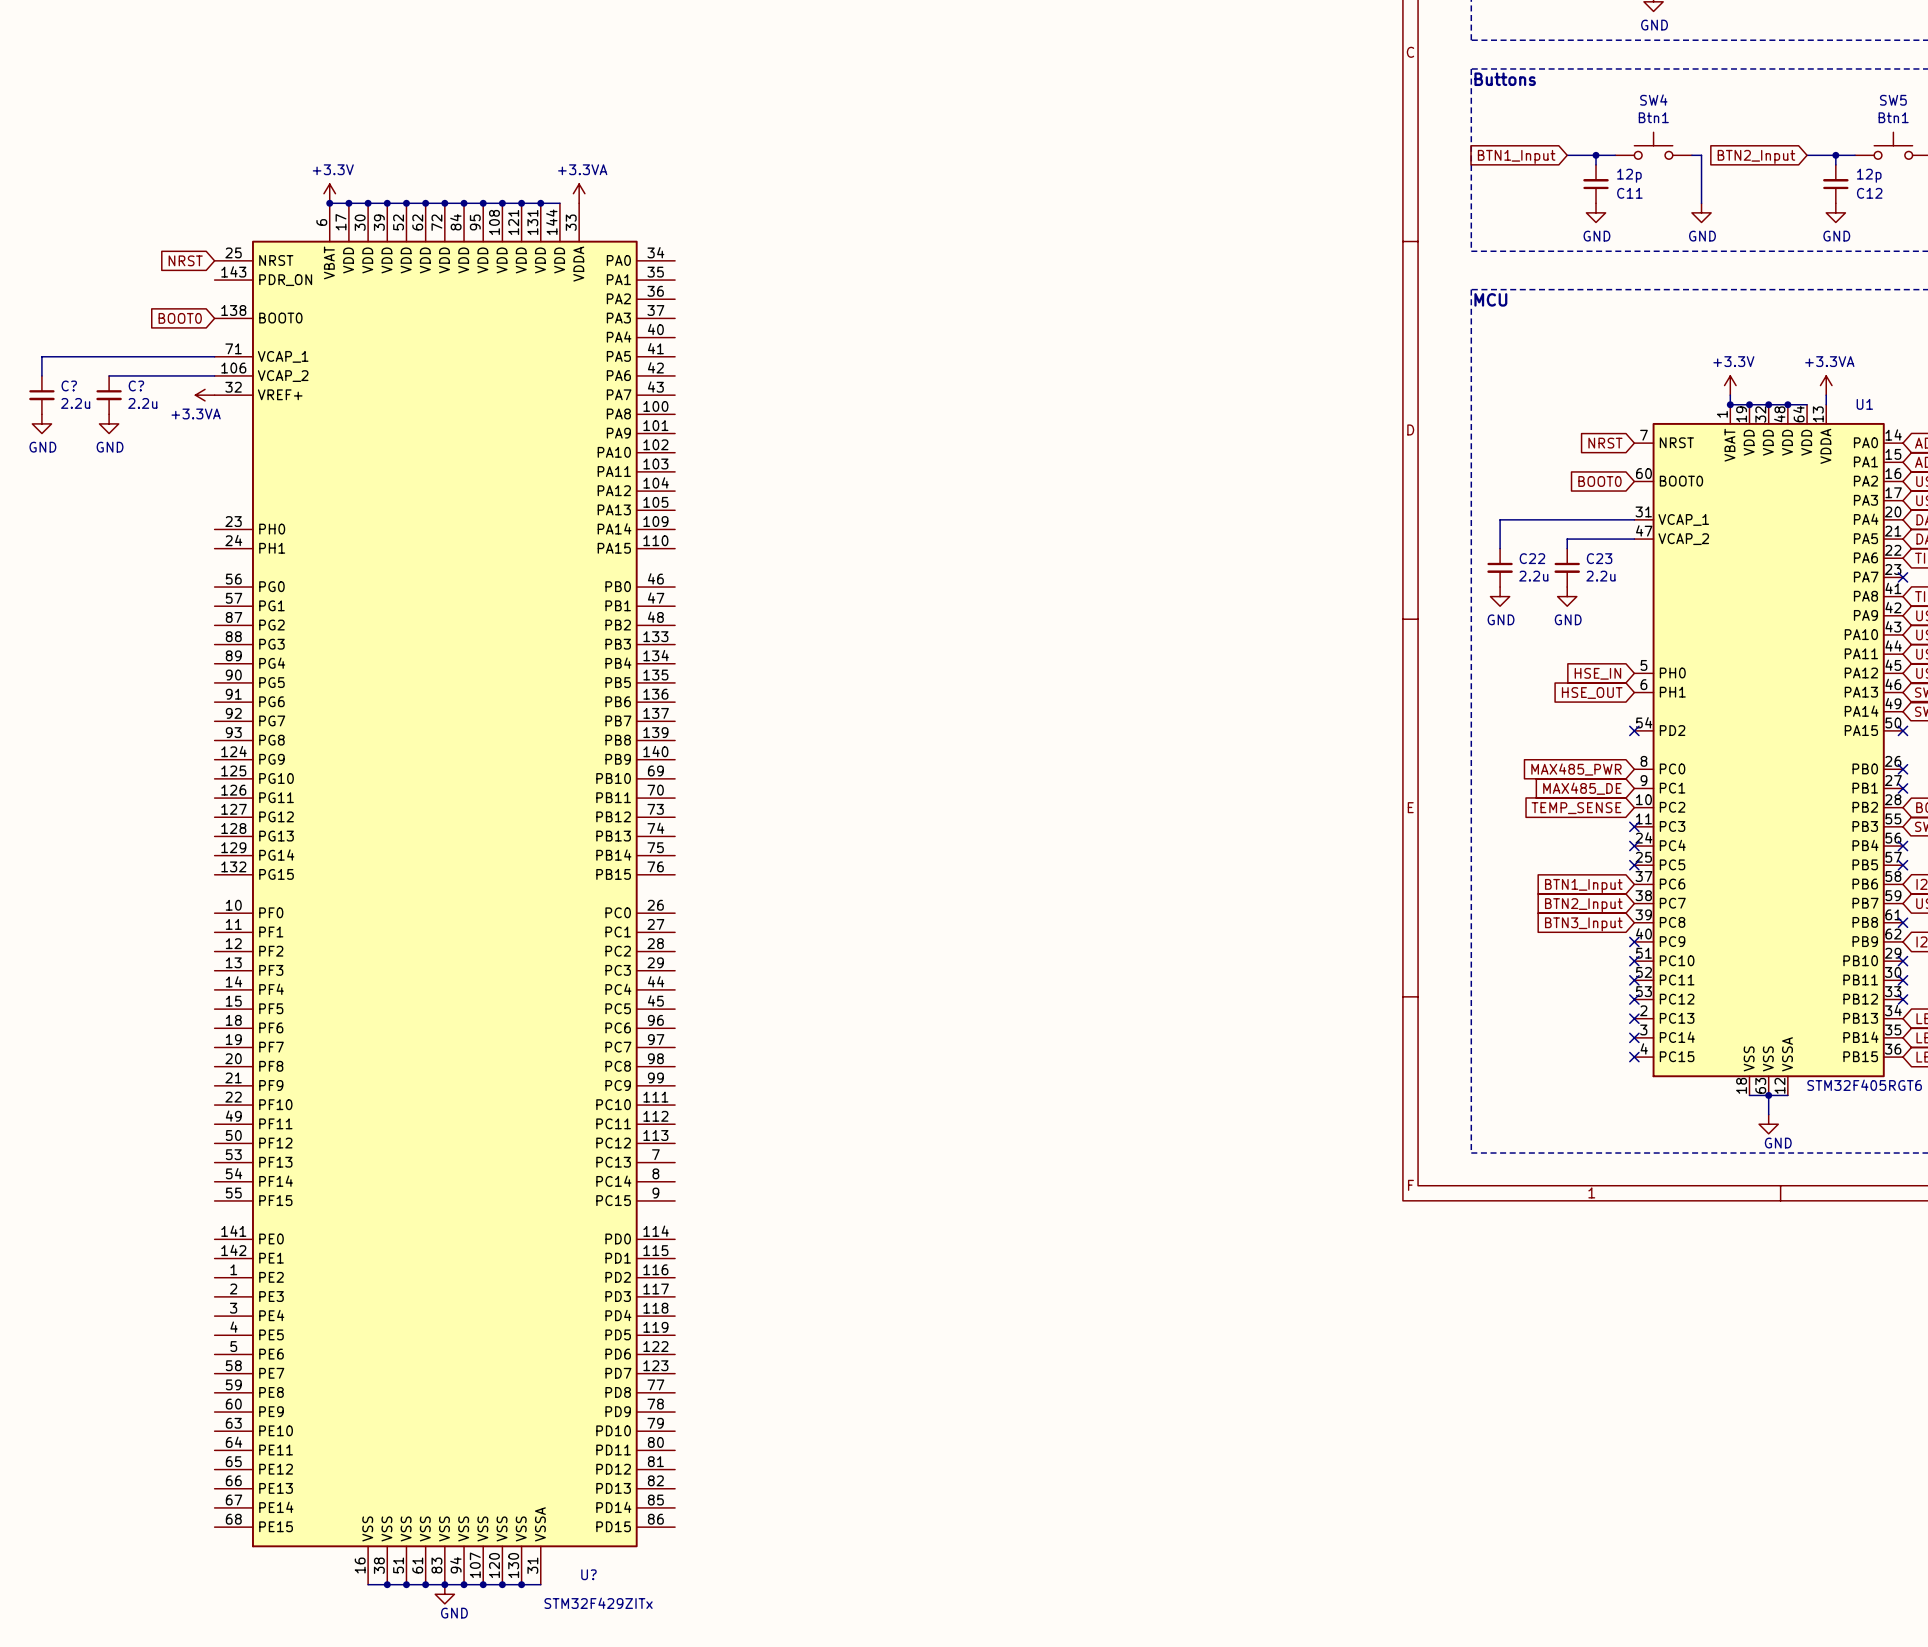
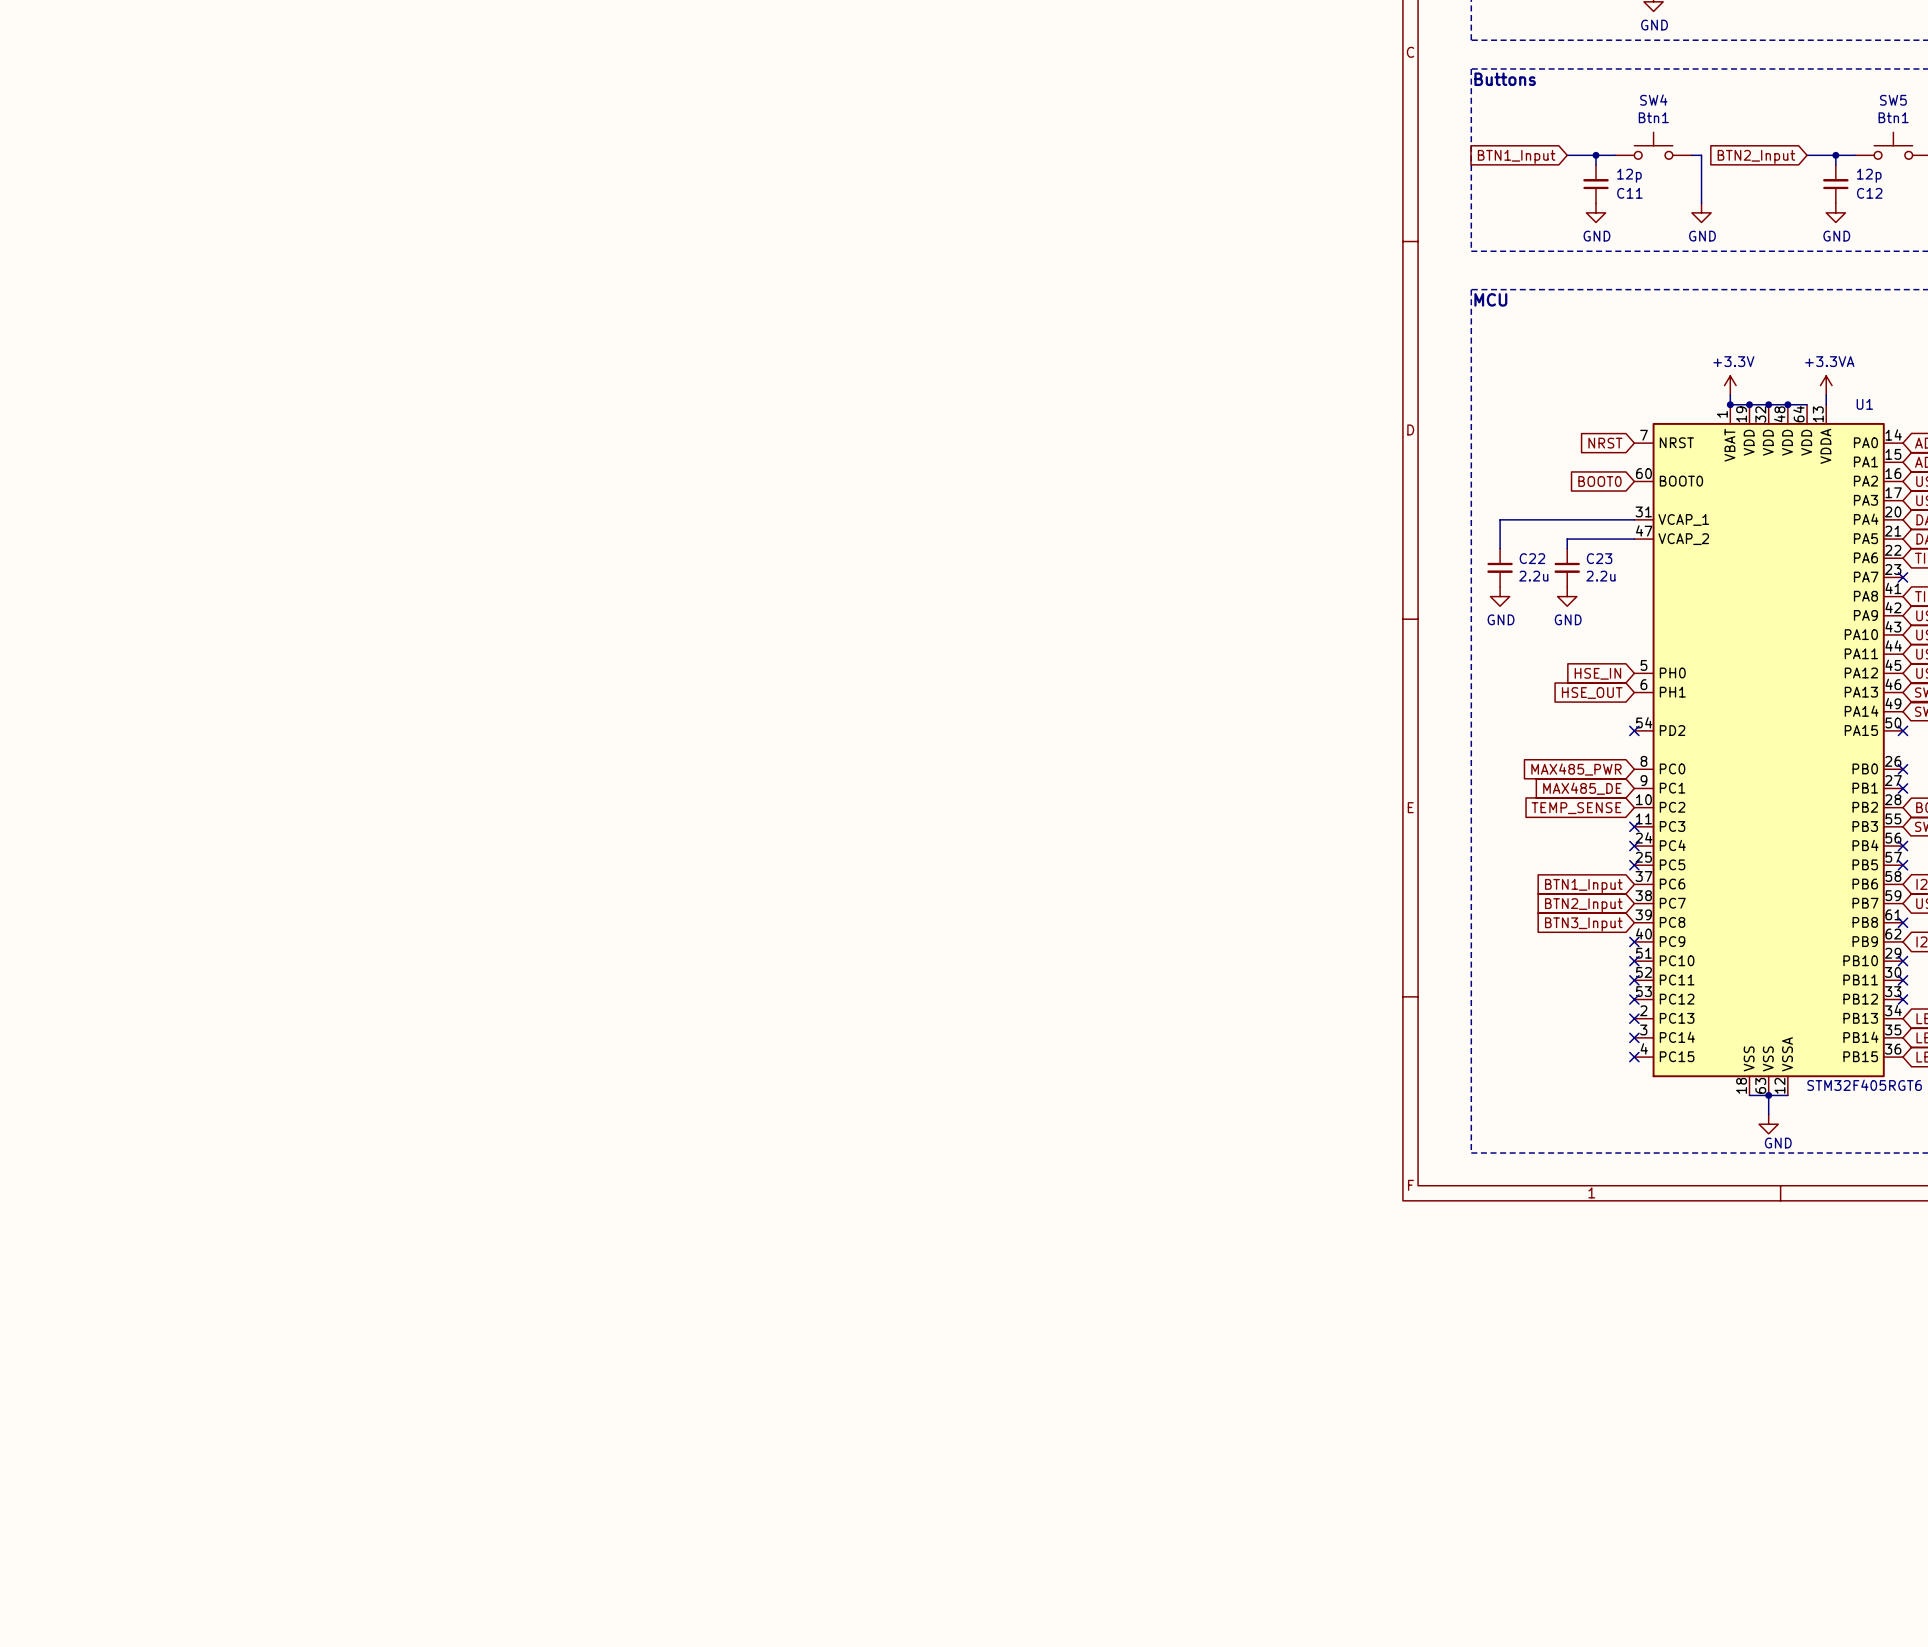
power symbol: +3.3V (329, 193) -> none
power symbol: +3.3VA (579, 193) -> none
wire: (329, 203) (559, 203) -> none
junction: (329, 203) -> none
junction: (348, 203) -> none
junction: (368, 203) -> none
junction: (387, 203) -> none
junction: (406, 203) -> none
junction: (425, 203) -> none
junction: (444, 203) -> none
junction: (464, 203) -> none
junction: (483, 203) -> none
junction: (502, 203) -> none
junction: (521, 203) -> none
junction: (540, 203) -> none
global label: NRST (185, 260) -> none
global label: BOOT0 (180, 318) -> none
wire: (214, 356) (41, 356) (41, 375) -> none
wire: (109, 375) (214, 375) -> none
C?: 2.2u (41, 395) -> none
C?: 2.2u (109, 395) -> none
power symbol: +3.3VA (205, 395) -> none
power symbol: GND (41, 423) -> none
power symbol: GND (109, 423) -> none
U?: STM32F429ZITx (444, 893) -> none
wire: (368, 1584) (540, 1584) -> none
junction: (387, 1584) -> none
junction: (406, 1584) -> none
junction: (425, 1584) -> none
junction: (444, 1584) -> none
junction: (464, 1584) -> none
junction: (483, 1584) -> none
junction: (502, 1584) -> none
junction: (521, 1584) -> none
power symbol: GND (444, 1594) -> none

